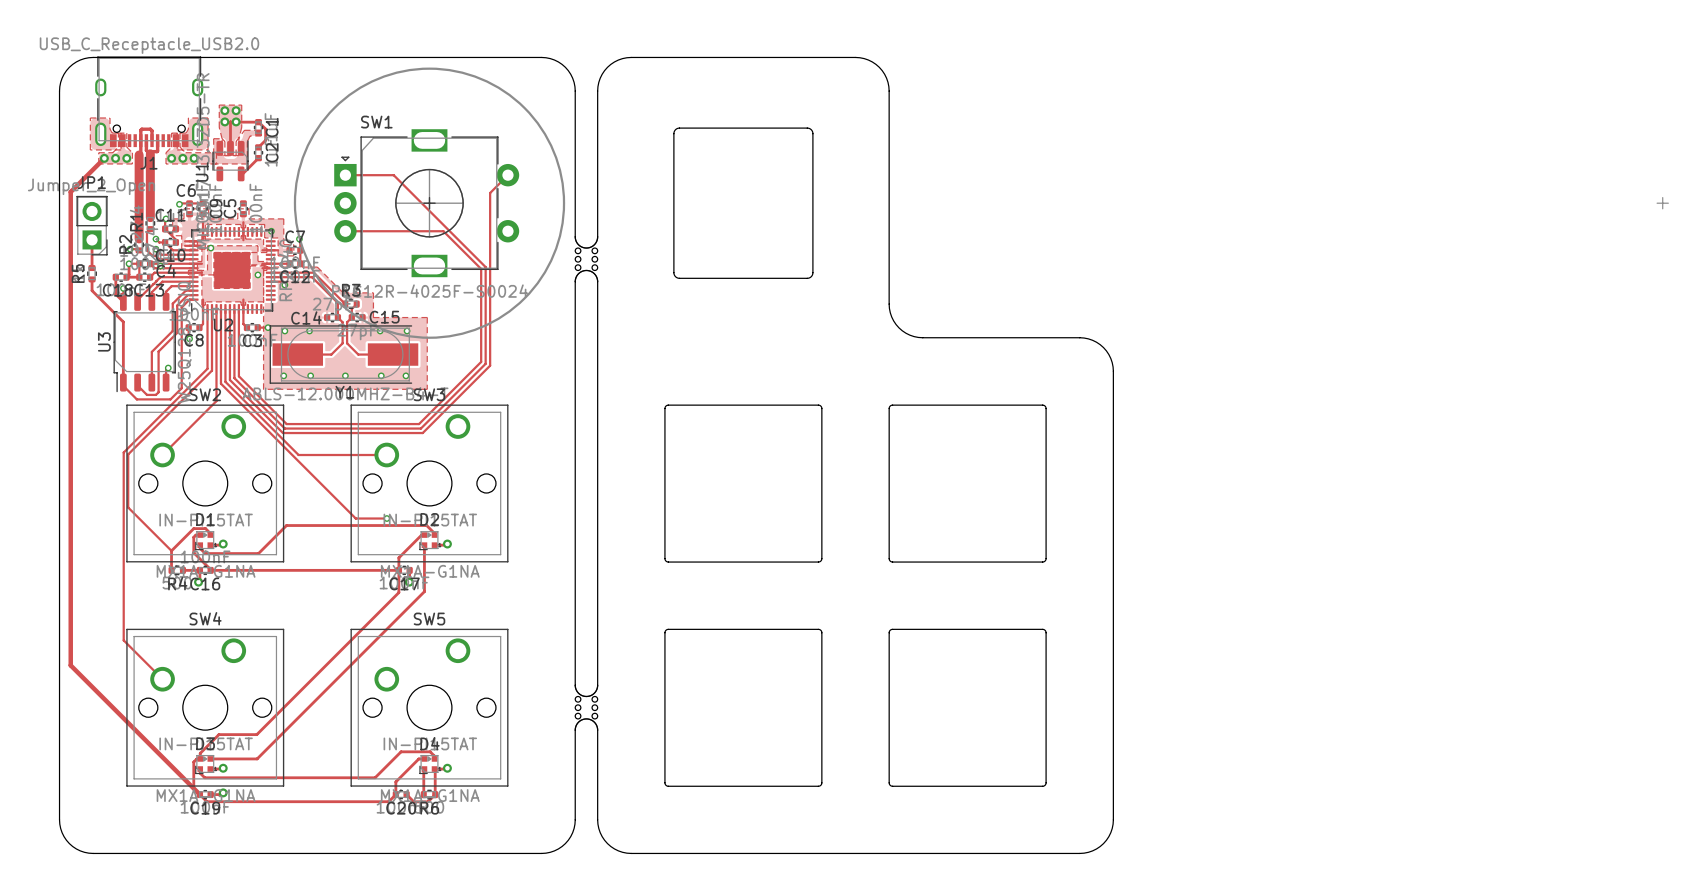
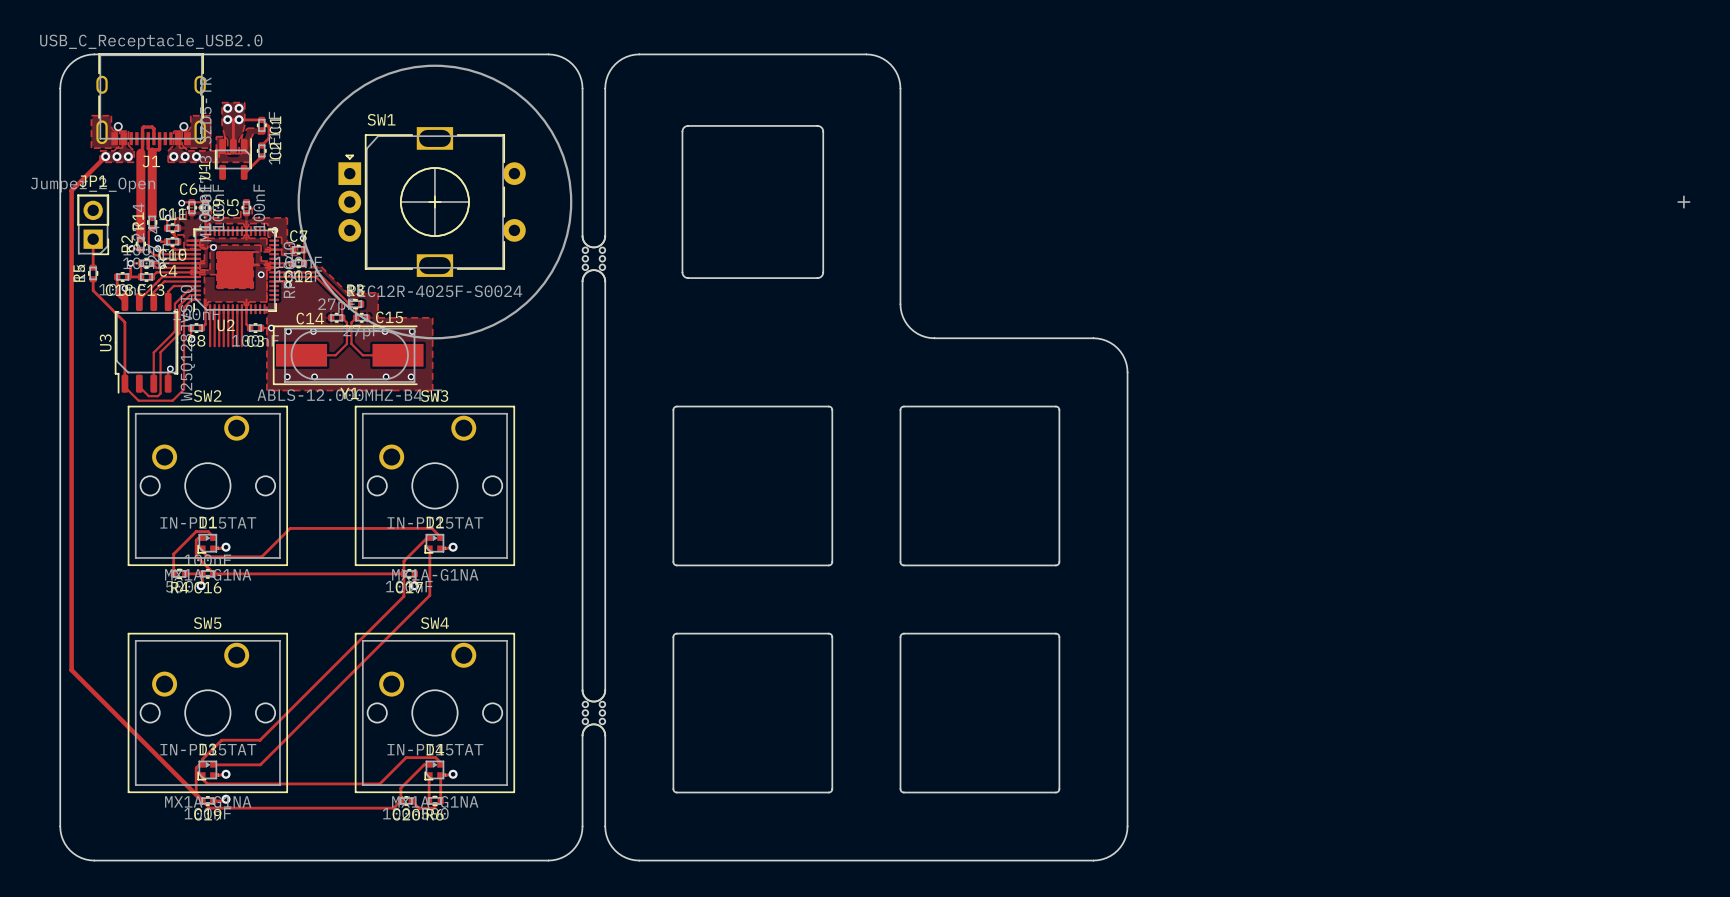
track: (345, 175) (393, 175) (485, 267) (485, 363) (420, 428) (284, 428) (234, 378) (234, 345) -> none
track: (507, 175) (490, 193) (490, 365) (422, 433) (282, 433) (229, 379) (229, 345) -> none
track: (345, 231) (443, 231) (481, 268) (481, 361) (419, 424) (286, 424) (238, 376) (238, 345) -> none
track: (207, 345) (207, 368) (123, 452) (123, 640) (162, 679) -> none
track: (212, 345) (212, 370) (128, 454) (128, 507) (171, 550) -> none
track: (216, 345) (216, 401) (162, 455) -> none
track: (220, 345) (220, 383) (355, 518) (386, 518) -> none
track: (225, 345) (225, 381) (298, 455) (386, 455) -> none
via: (386, 518) -> none
SW4 name: SW4 (205, 618) -> SW5 (207, 623)
SW5 name: SW5 (429, 619) -> SW4 (434, 623)

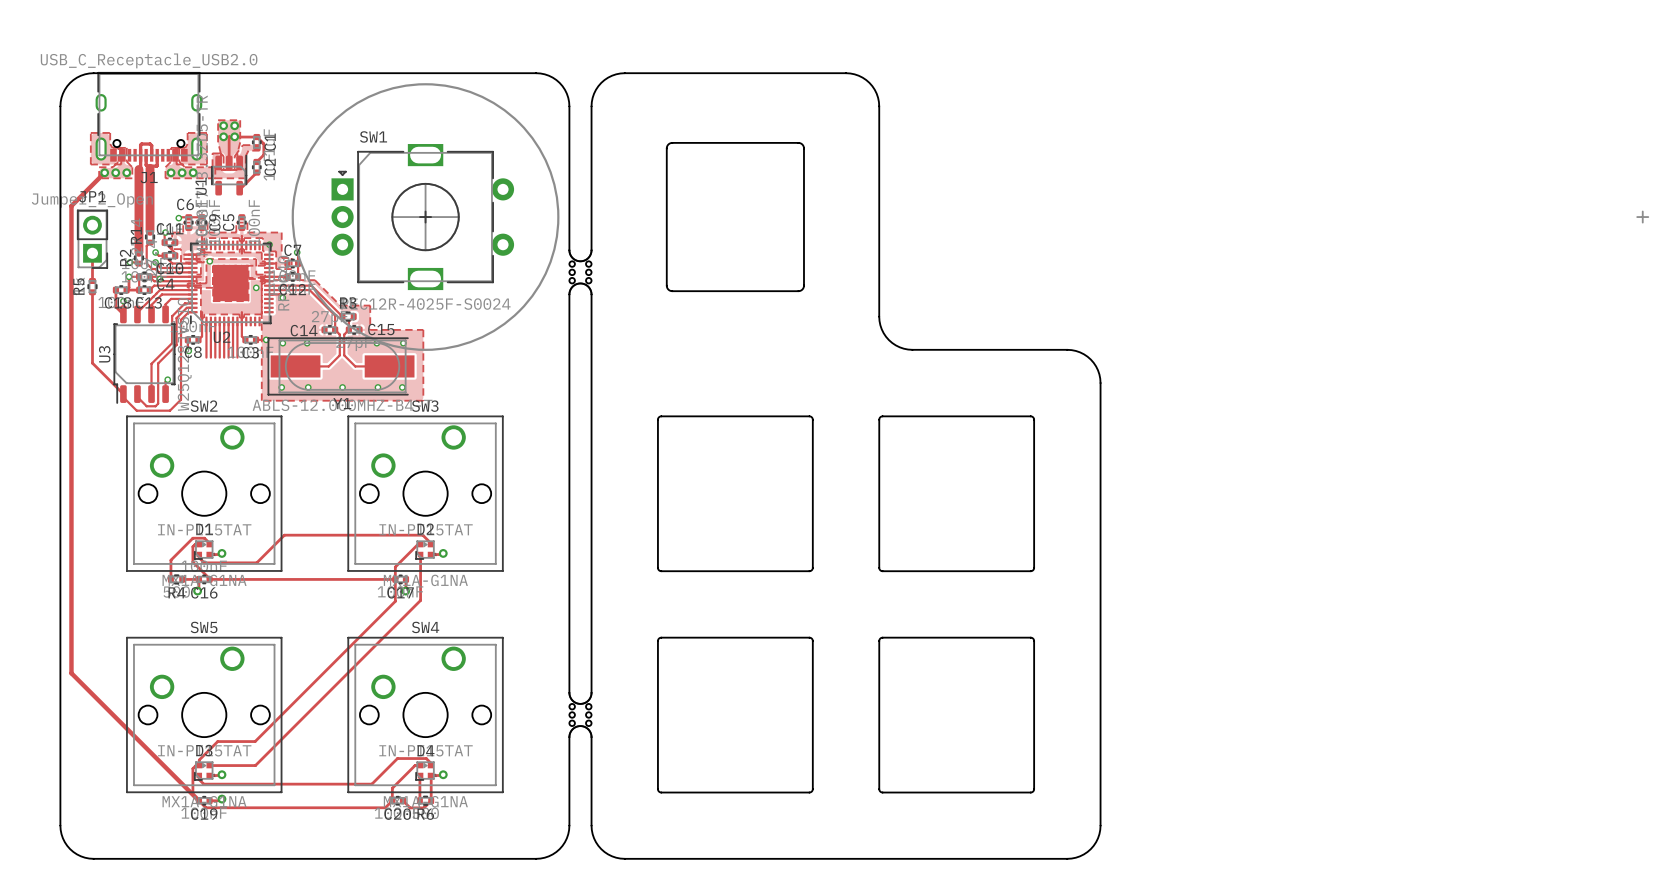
track: (93, 290) (124, 322) (124, 383) -> (92, 303) (92, 363) (123, 394)

